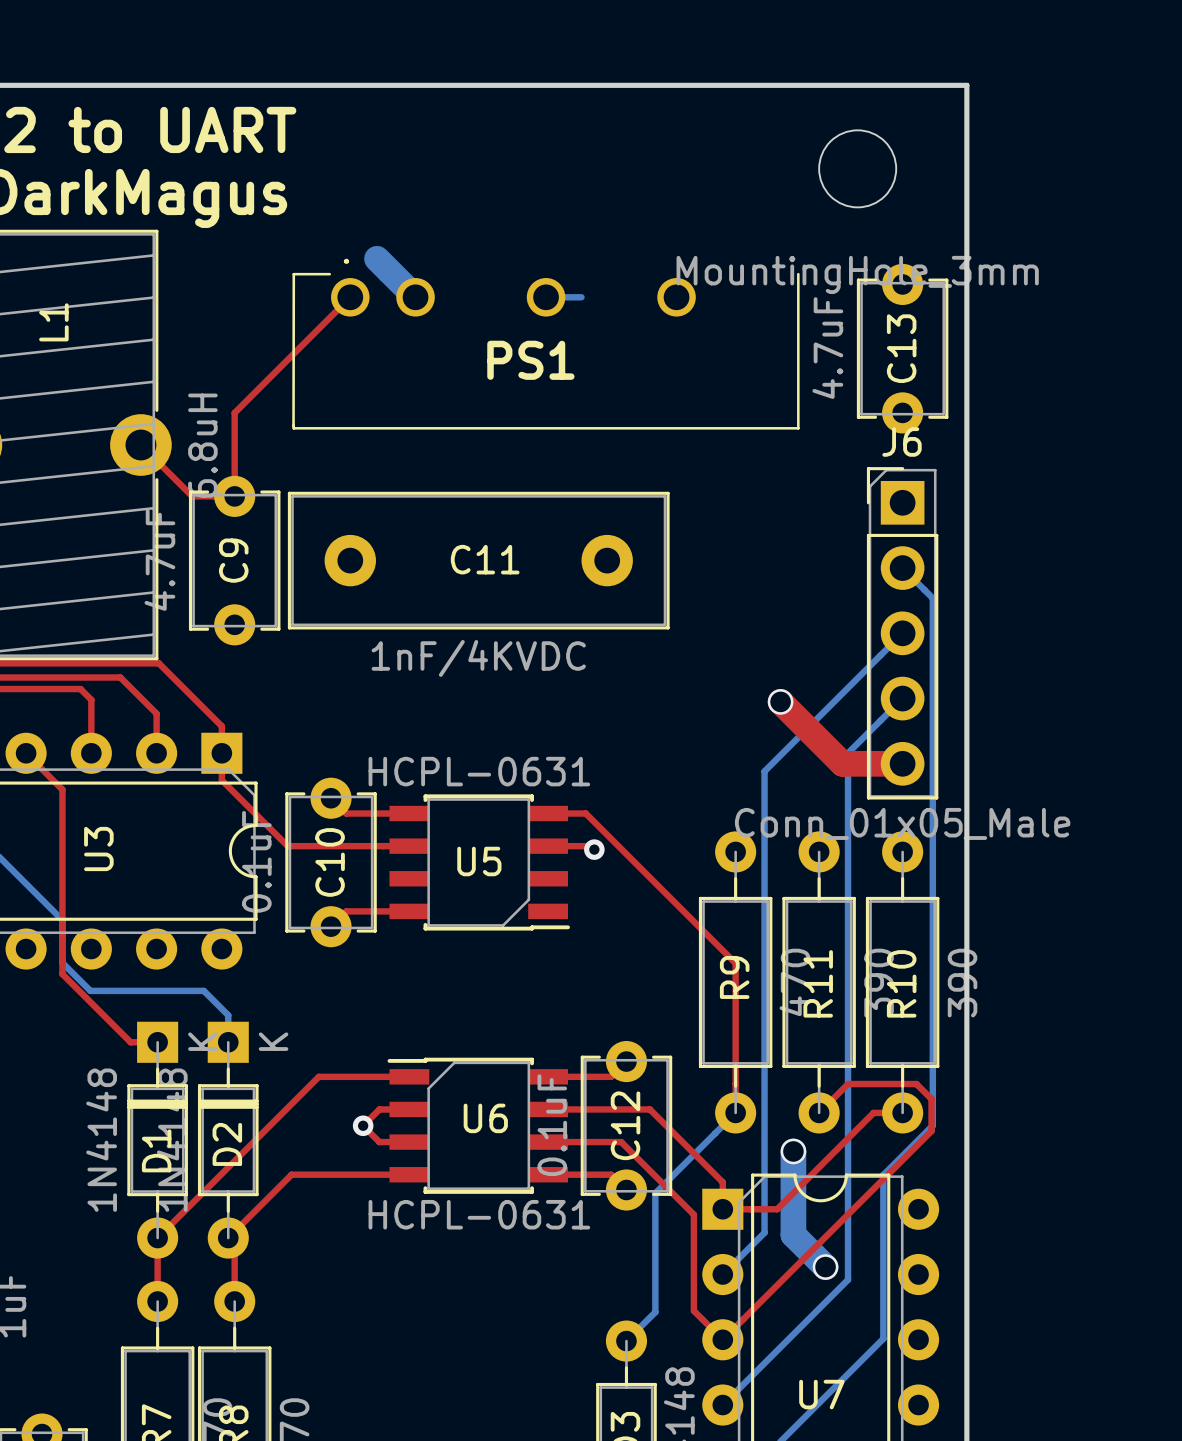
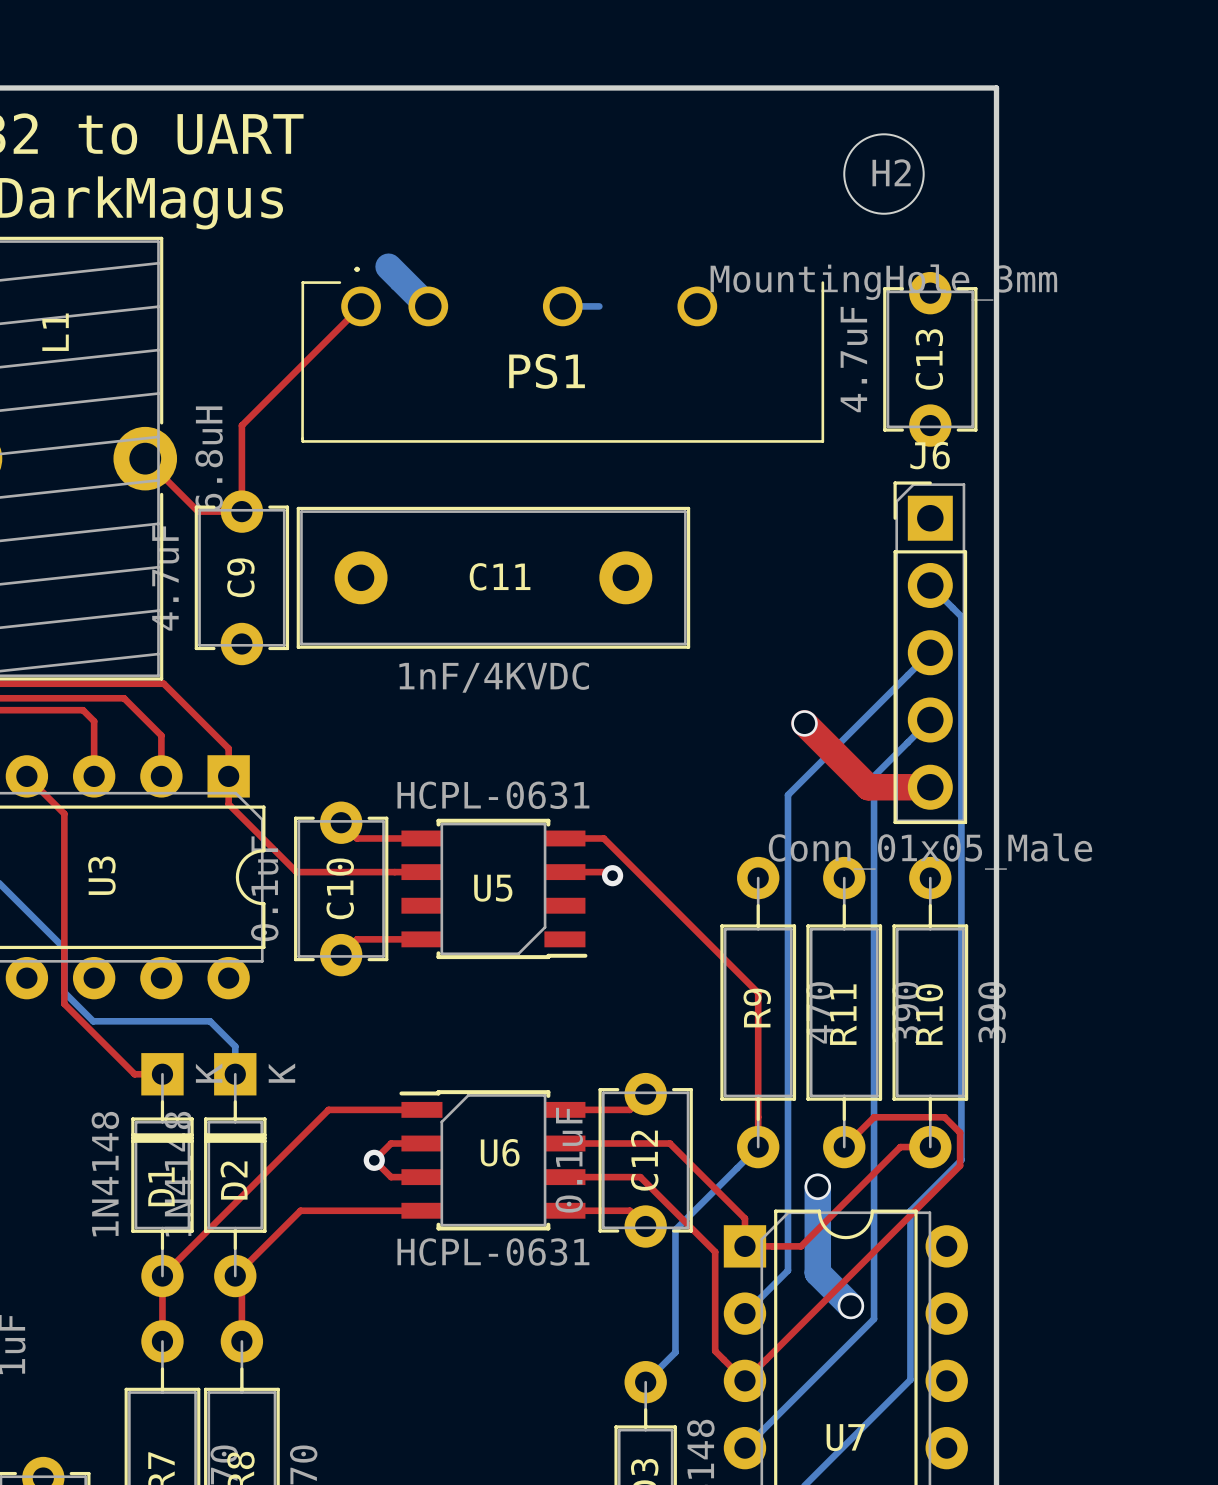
H2 name: none -> H2 (891, 172)

